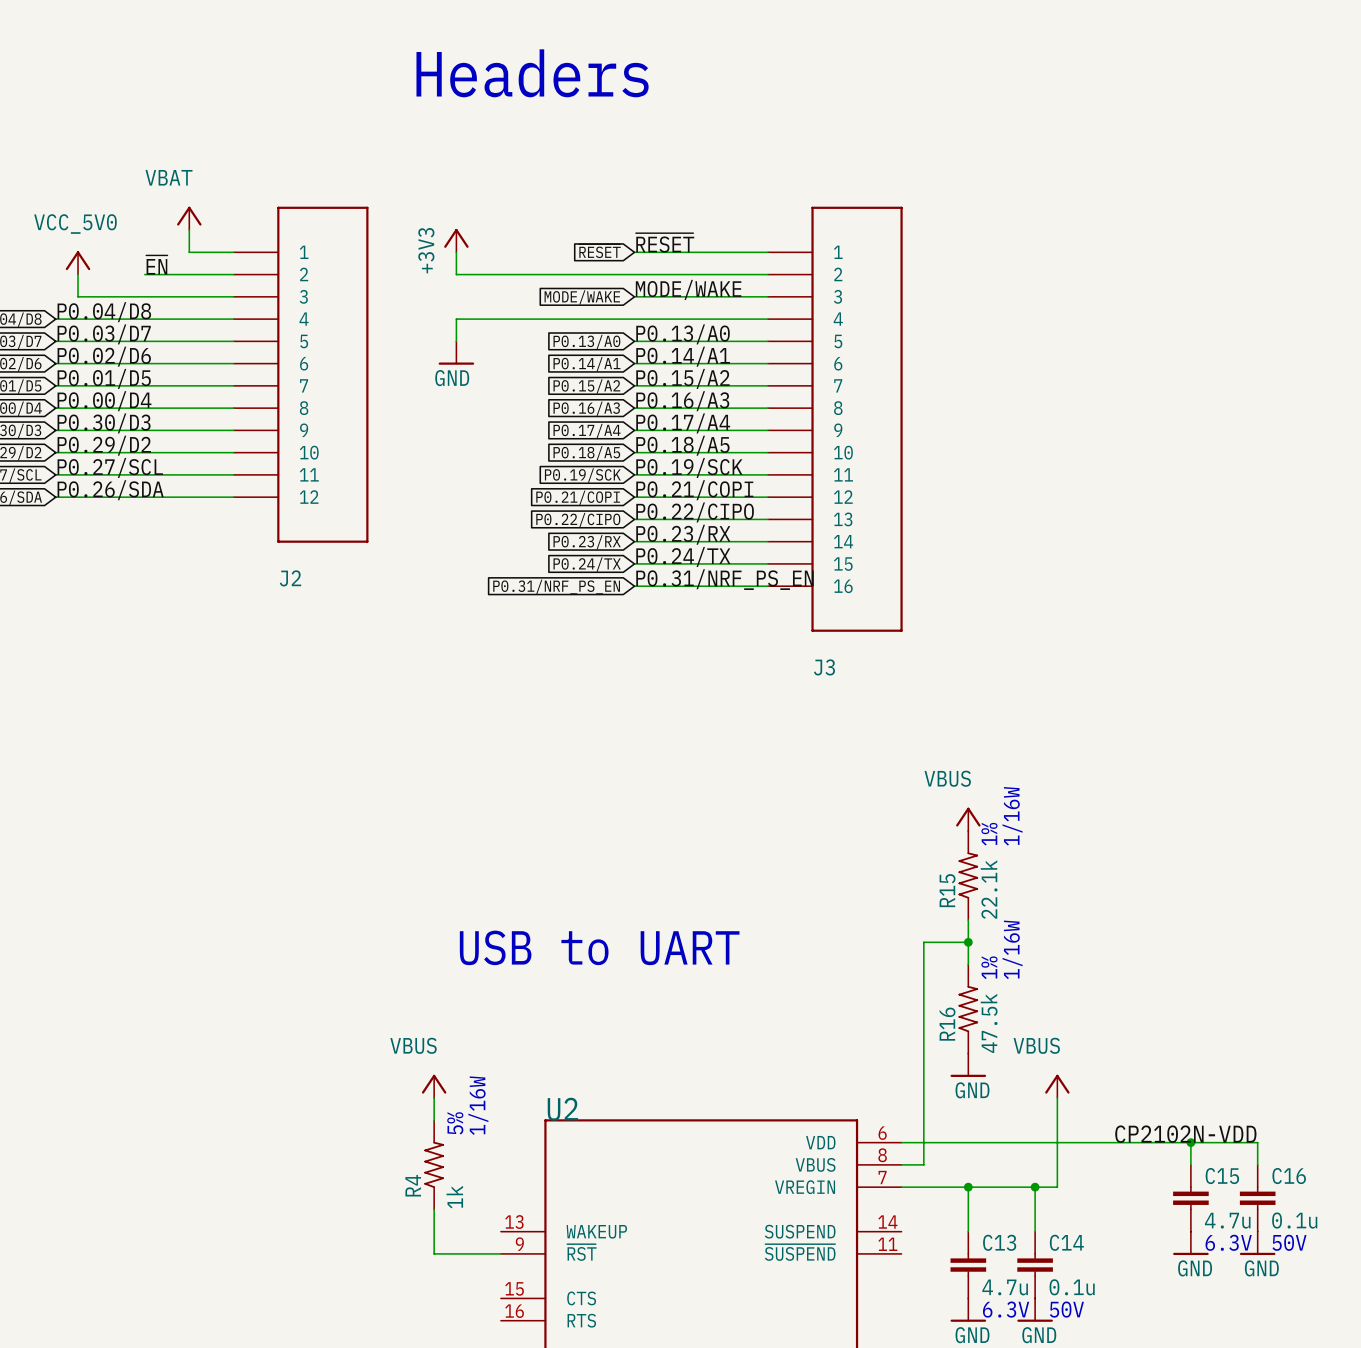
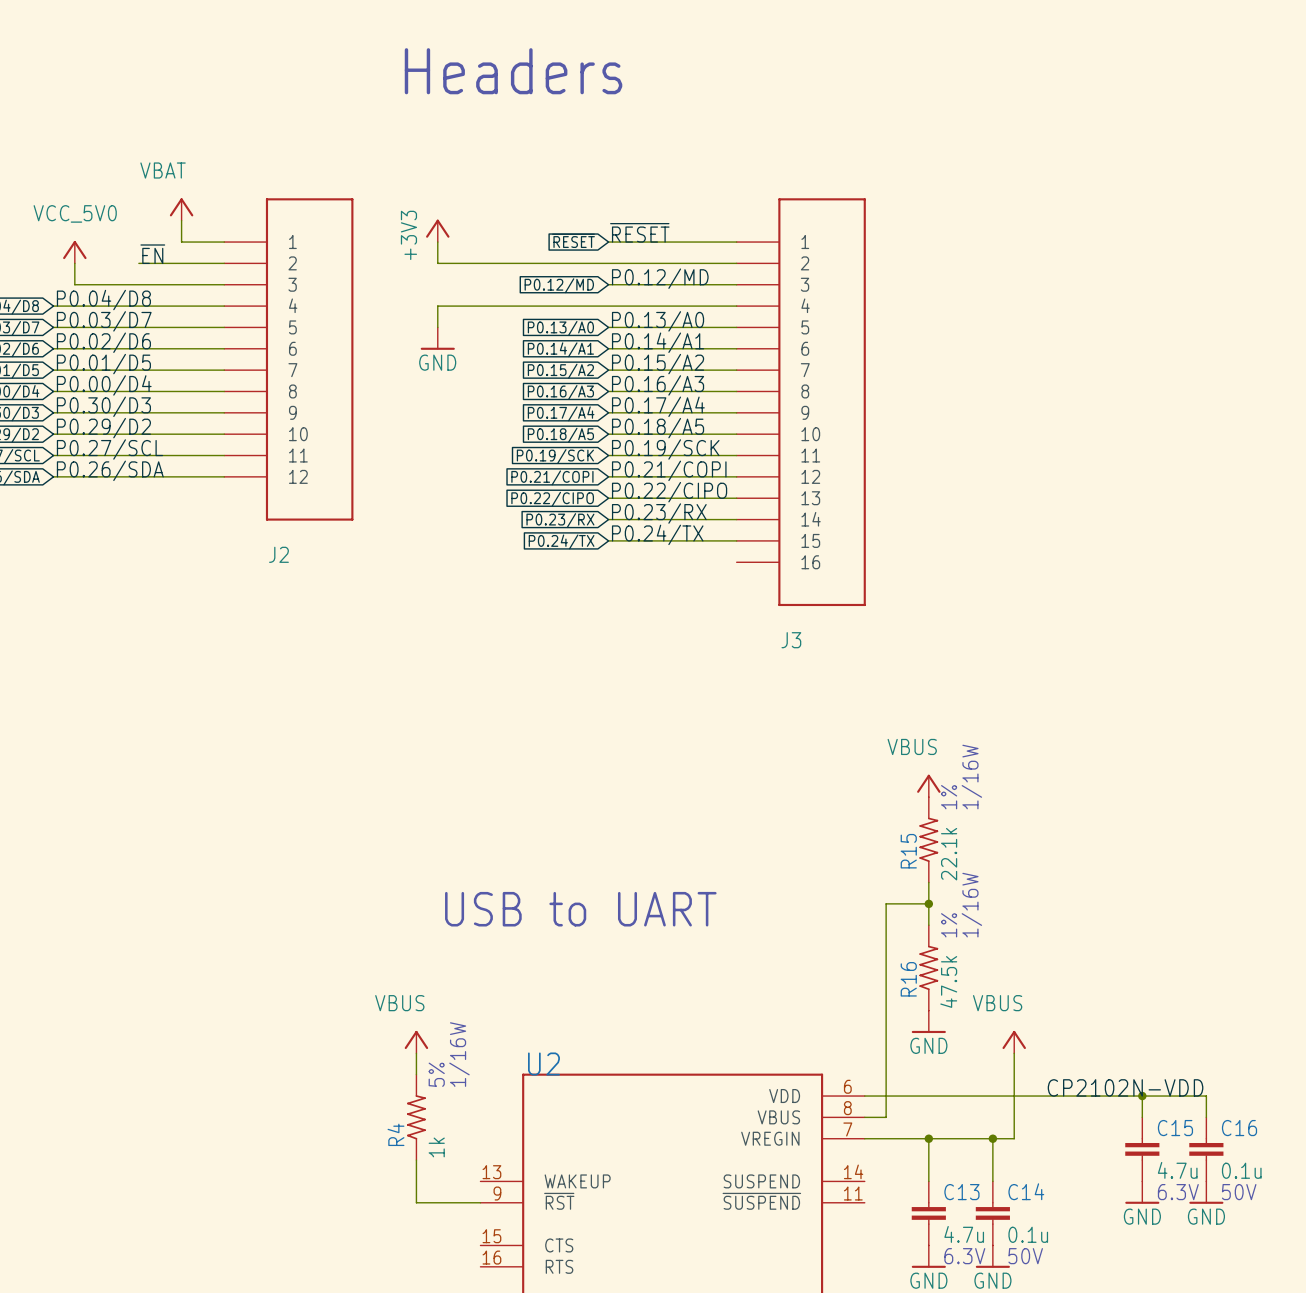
label: MODE/WAKE (688, 289) -> P0.12/MD (660, 278)
global label: MODE/WAKE (582, 297) -> P0.12/MD (559, 285)
label: P0.31/NRF_PS_EN (724, 579) -> none
wire: (634, 586) (768, 586) -> none
global label: P0.31/NRF_PS_EN (556, 587) -> none

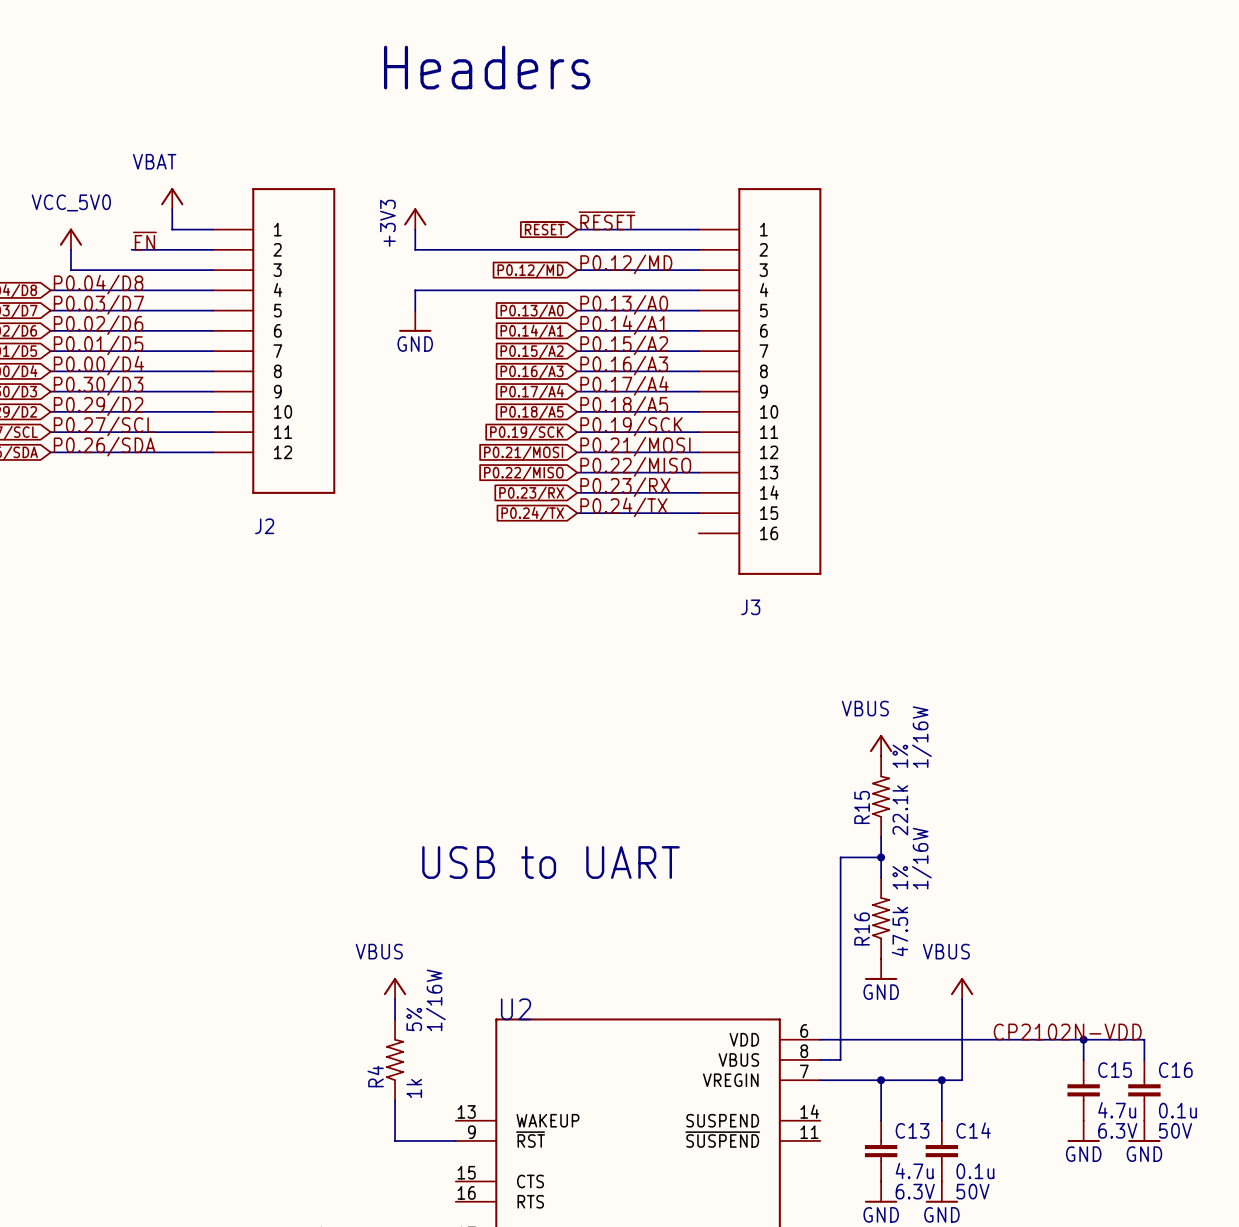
label: P0.21/COPI (669, 470) -> P0.21/MOSI (635, 446)
global label: P0.21/COPI (552, 477) -> P0.21/MOSI (523, 453)
label: P0.22/CIPO (669, 492) -> P0.22/MISO (635, 466)
global label: P0.22/CIPO (552, 499) -> P0.22/MISO (523, 473)

